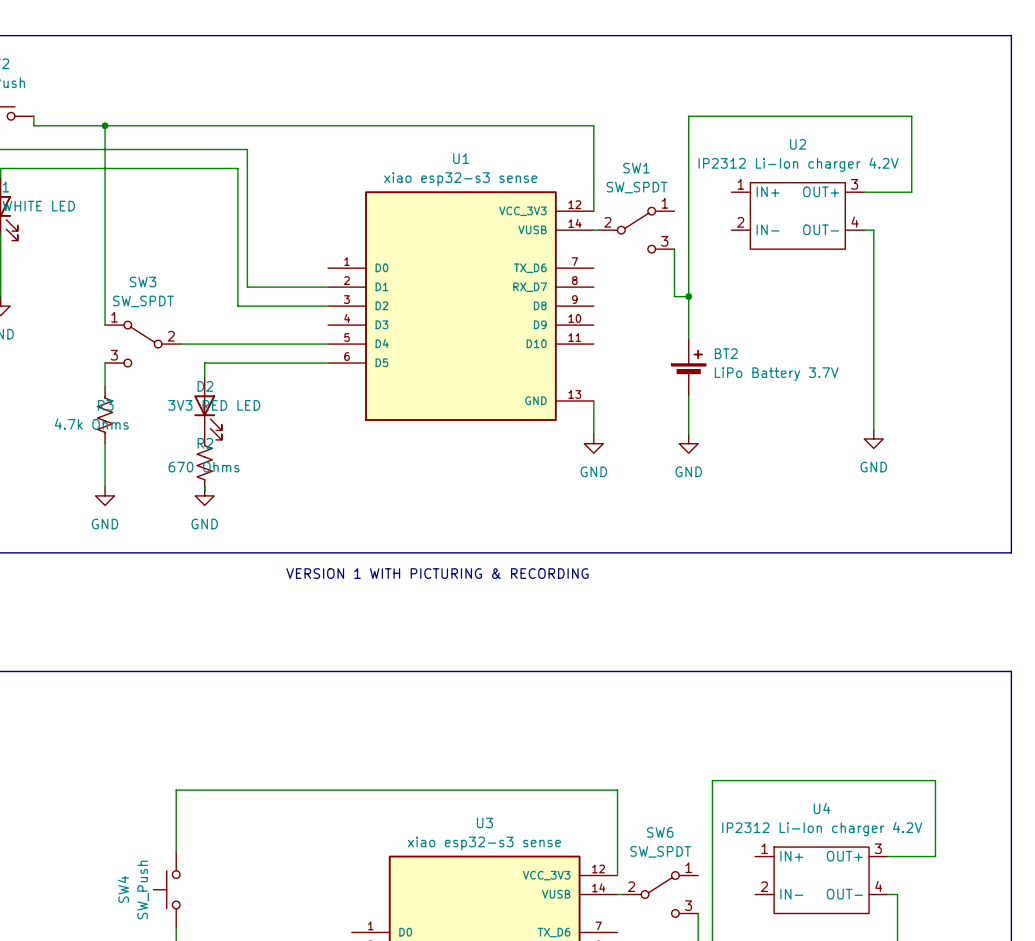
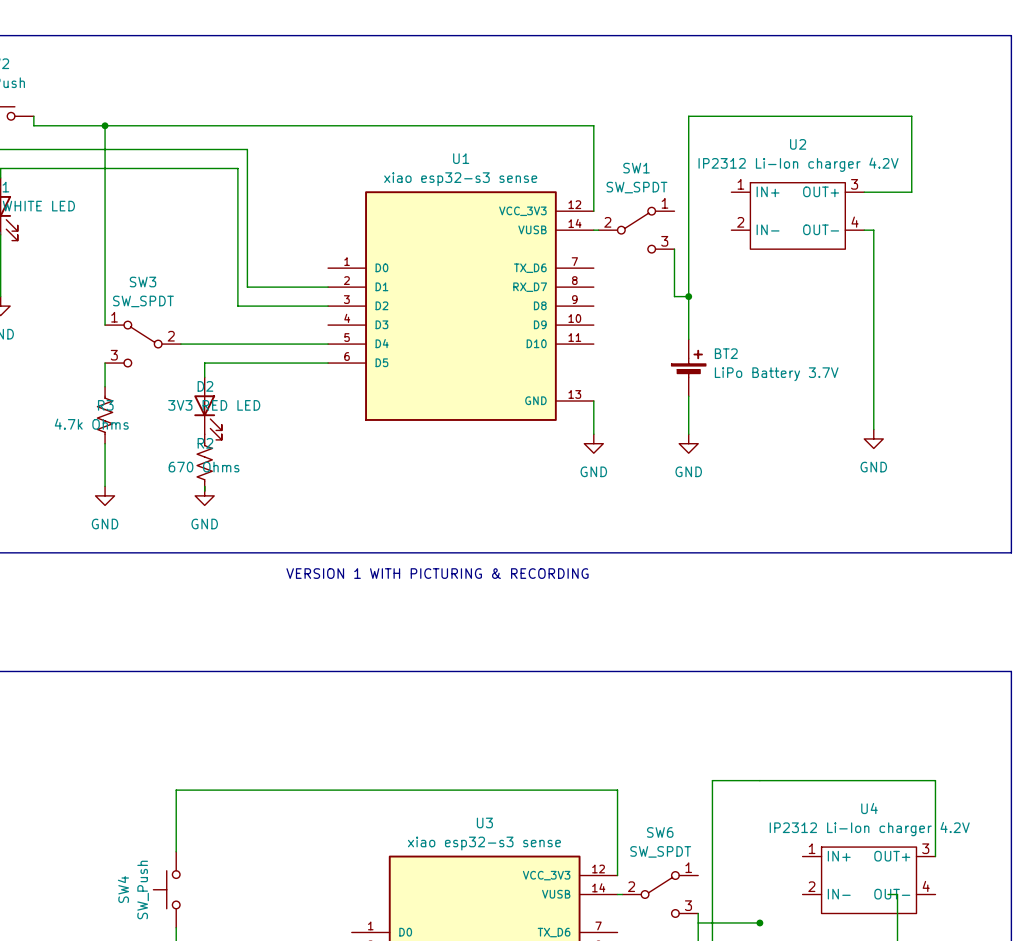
U4 position: (821, 880) -> (869, 880)
wire: none -> (698, 922) (759, 922)
junction: none -> (759, 922)

